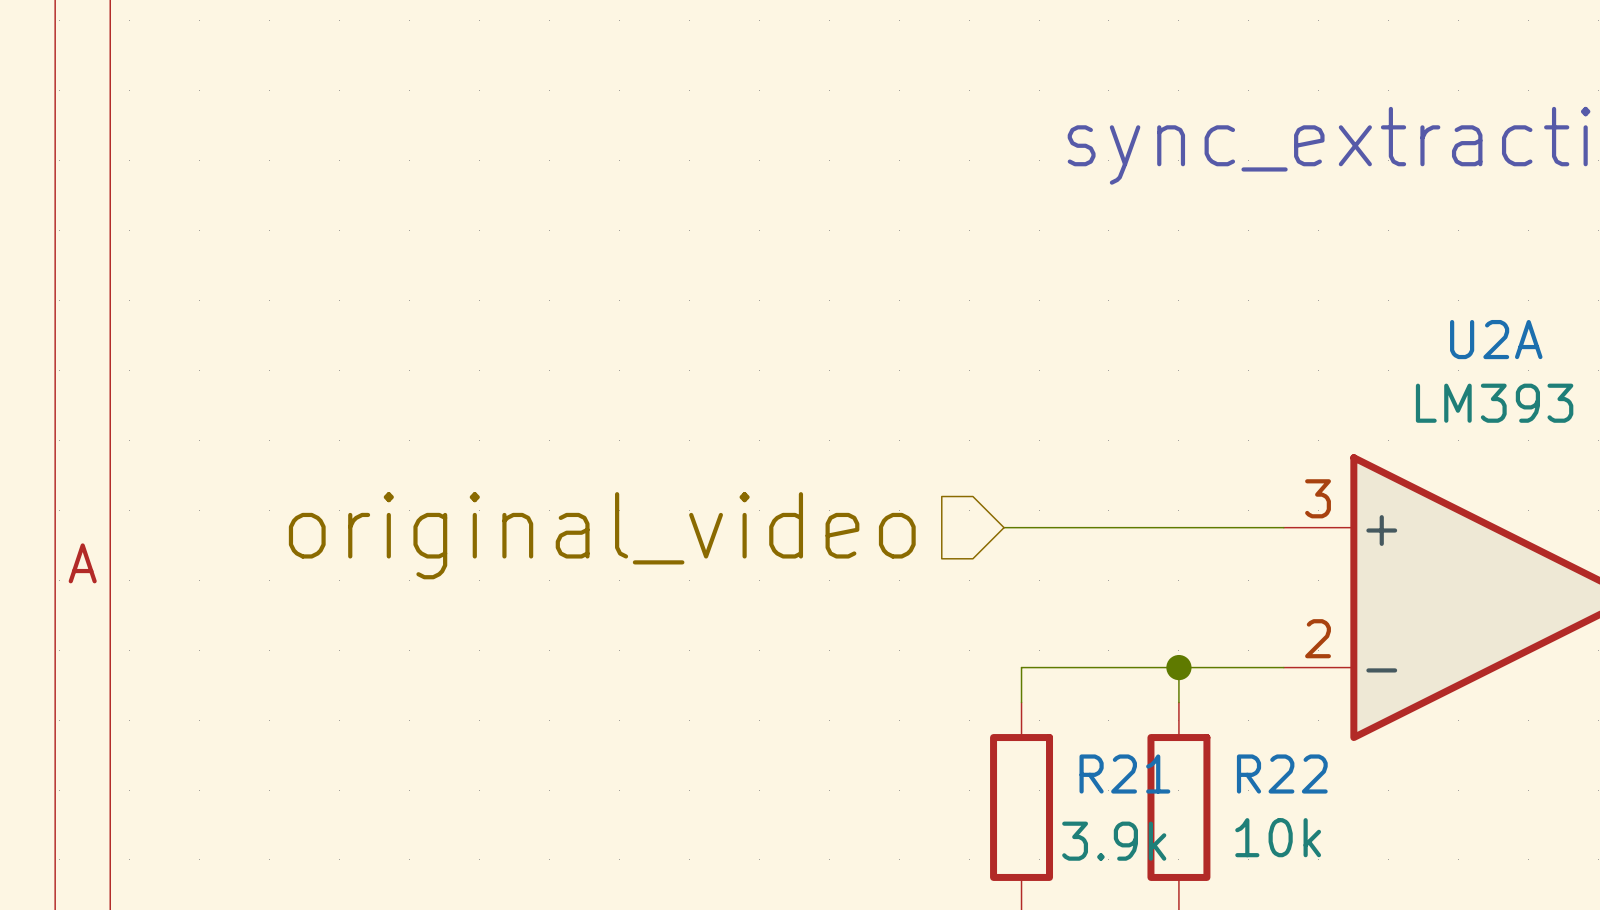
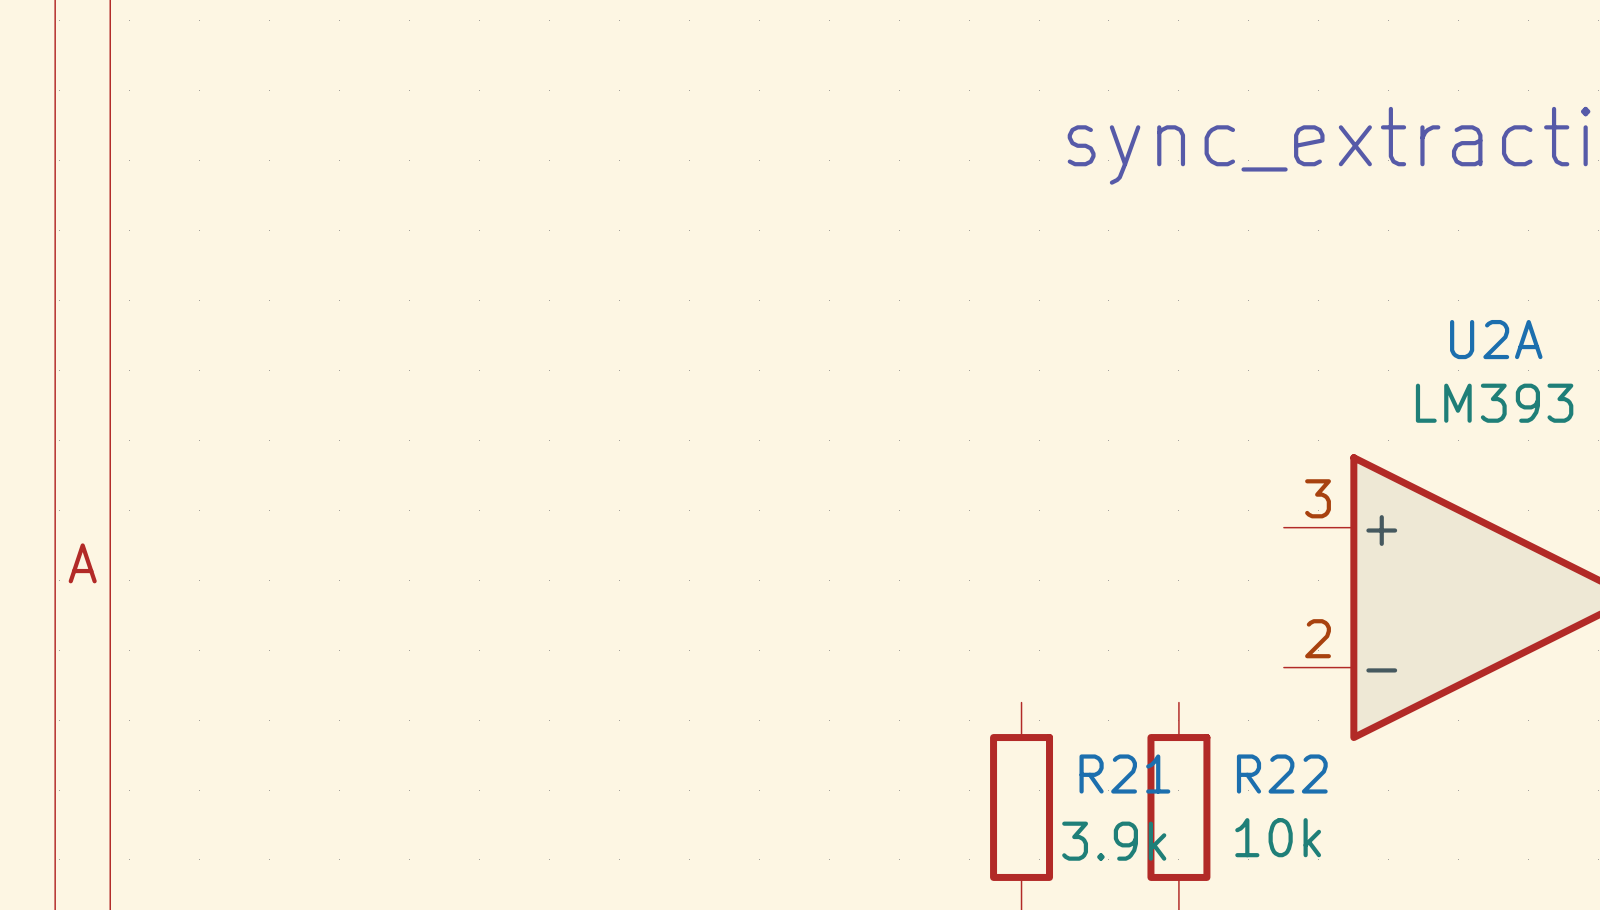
wire: (1004, 527) (1283, 527) -> none
hierarchical label: original_video (602, 535) -> none
wire: (1178, 667) (1178, 702) -> none
junction: (1178, 667) -> none
wire: (1283, 667) (1021, 667) (1021, 702) -> none

